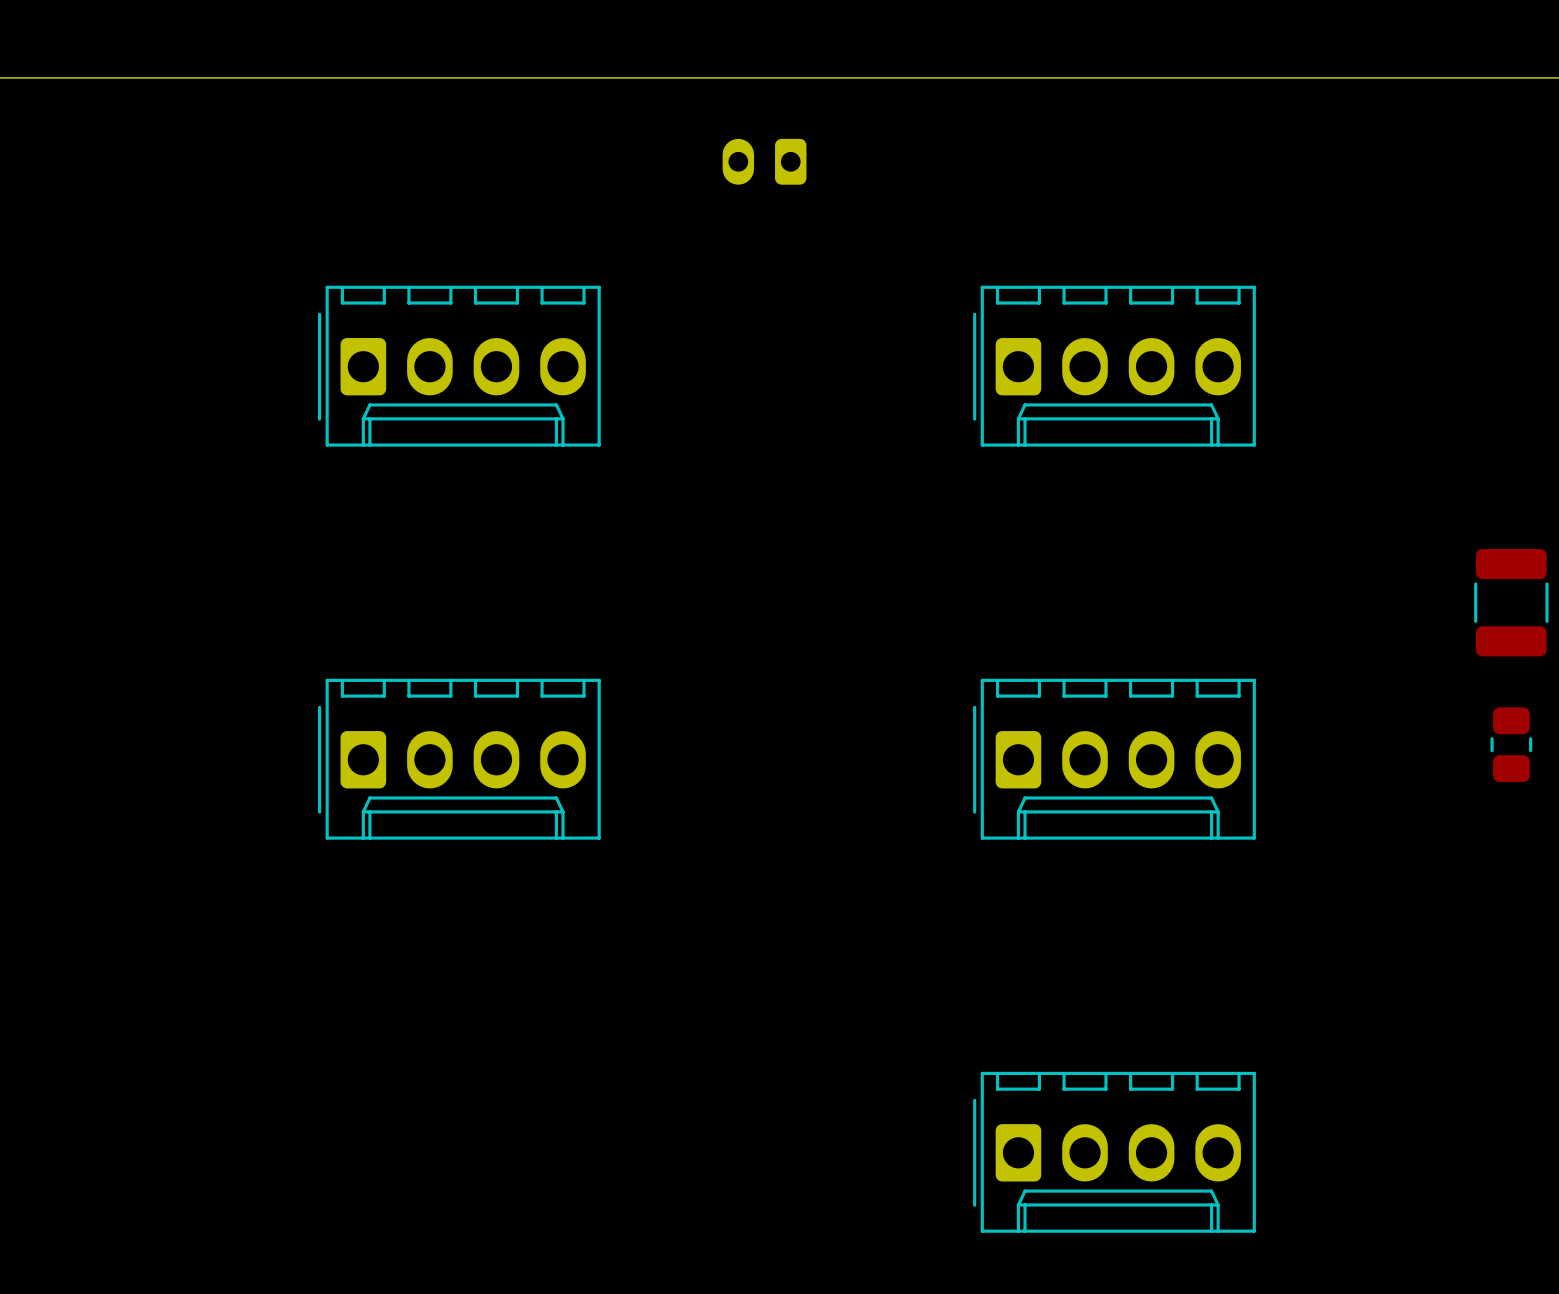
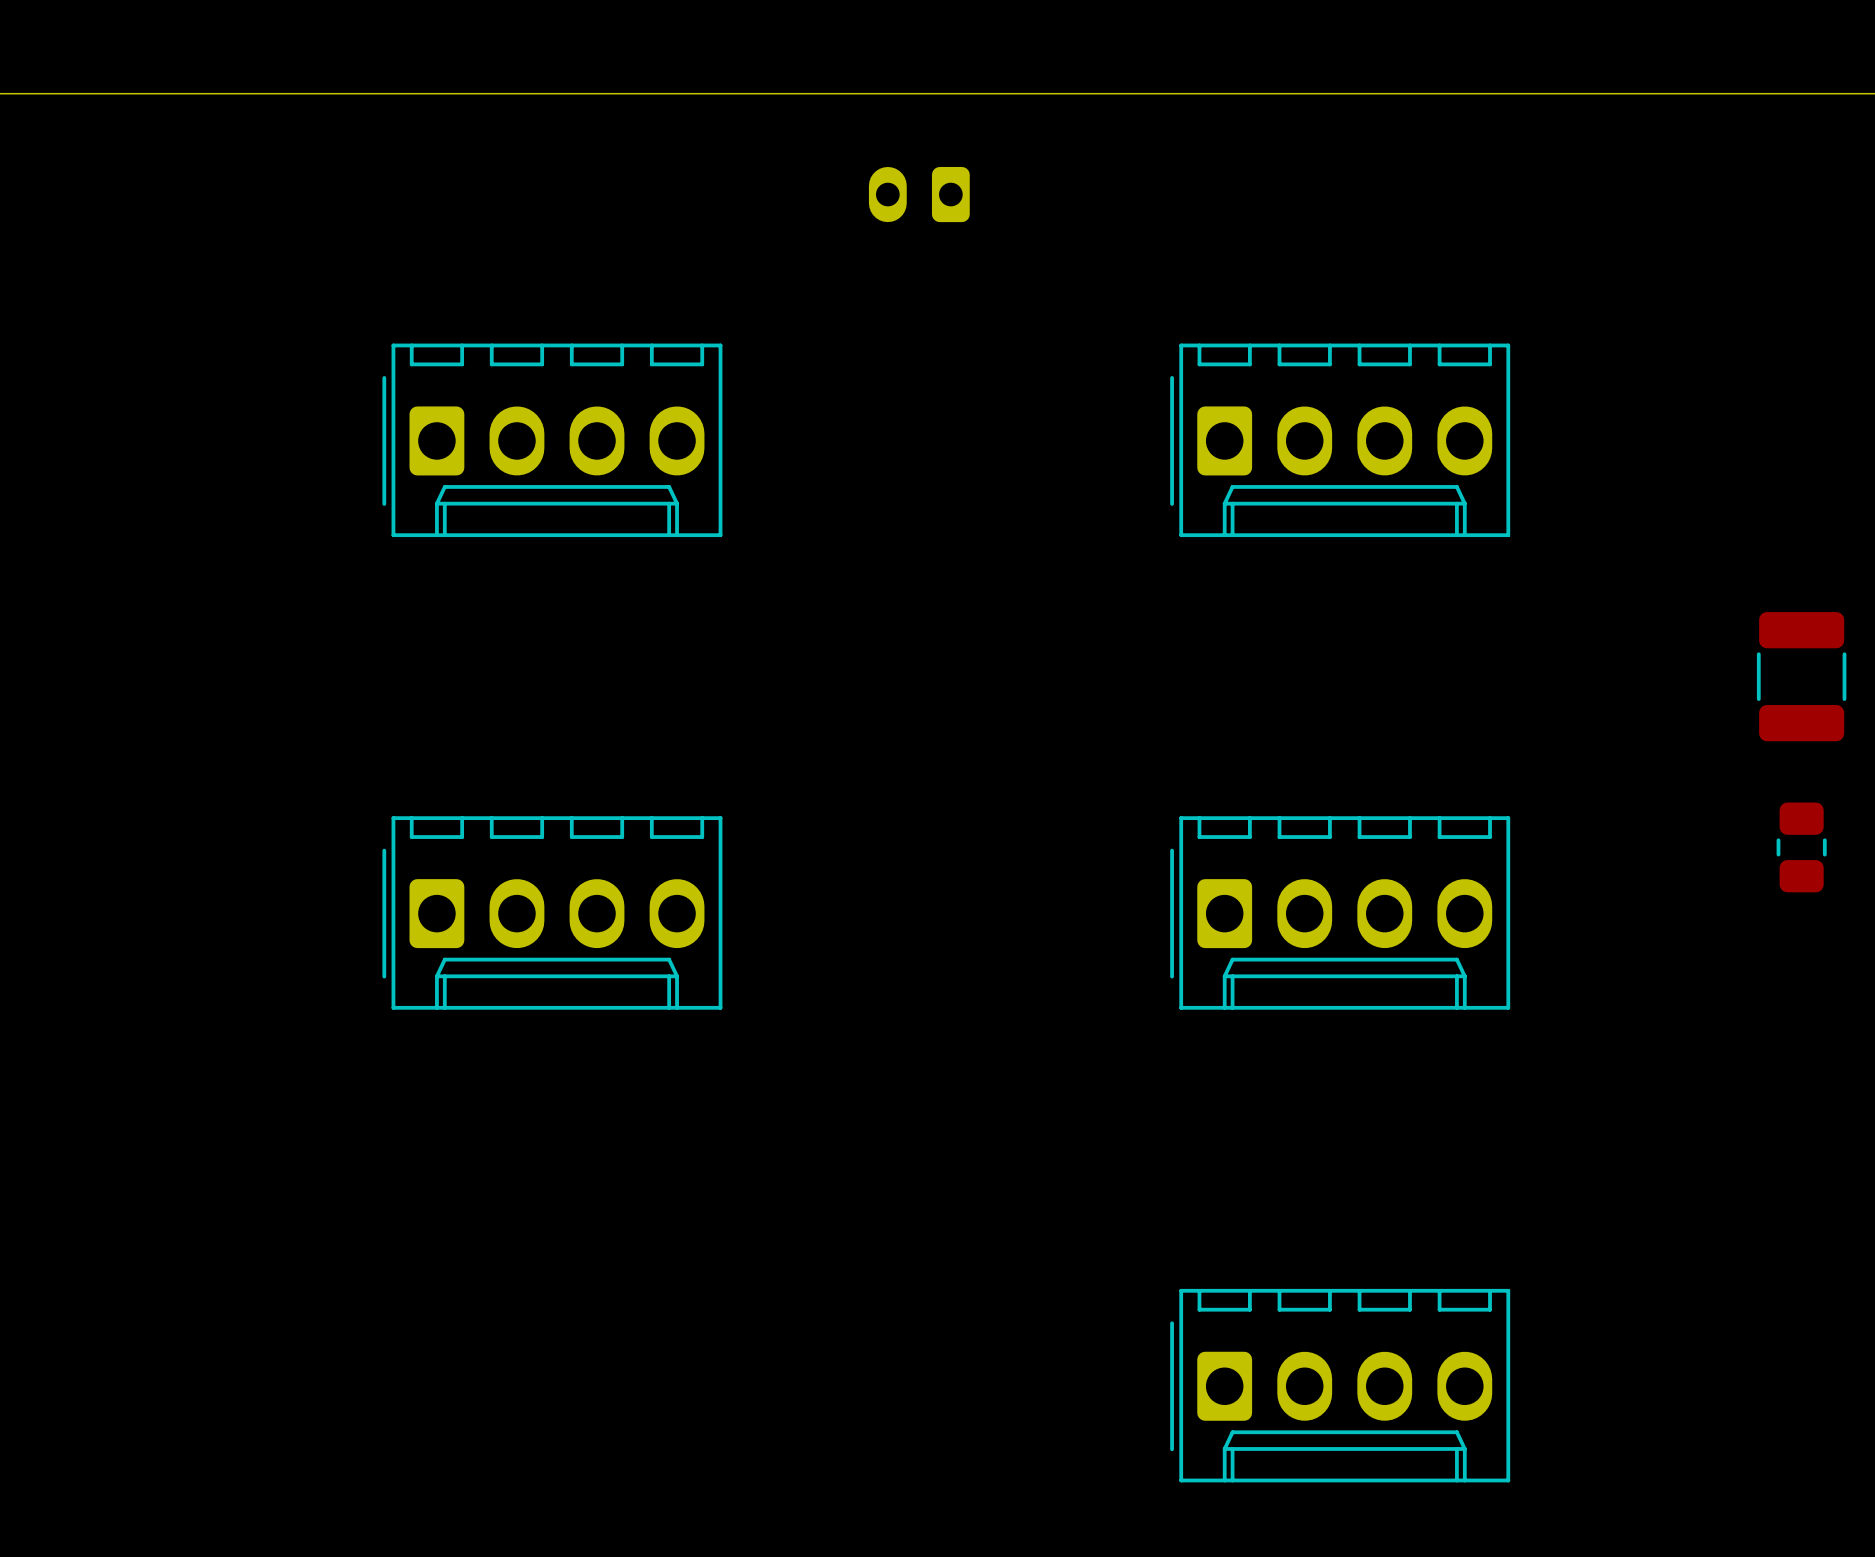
part position: (1511, 602) -> (1801, 676)
part position: (1511, 744) -> (1801, 847)

